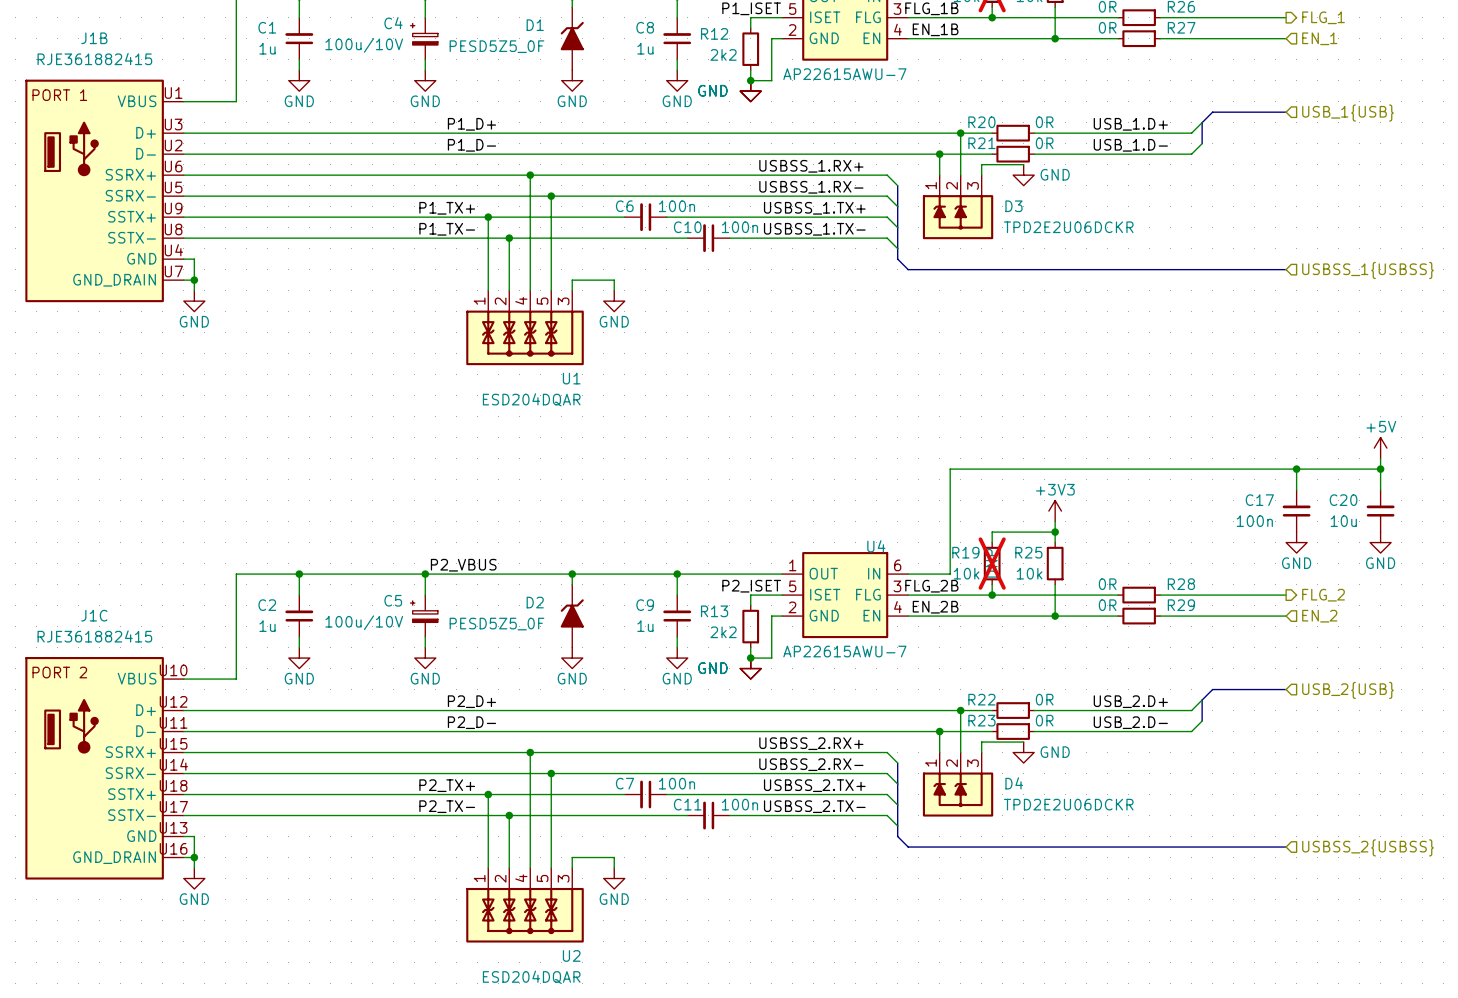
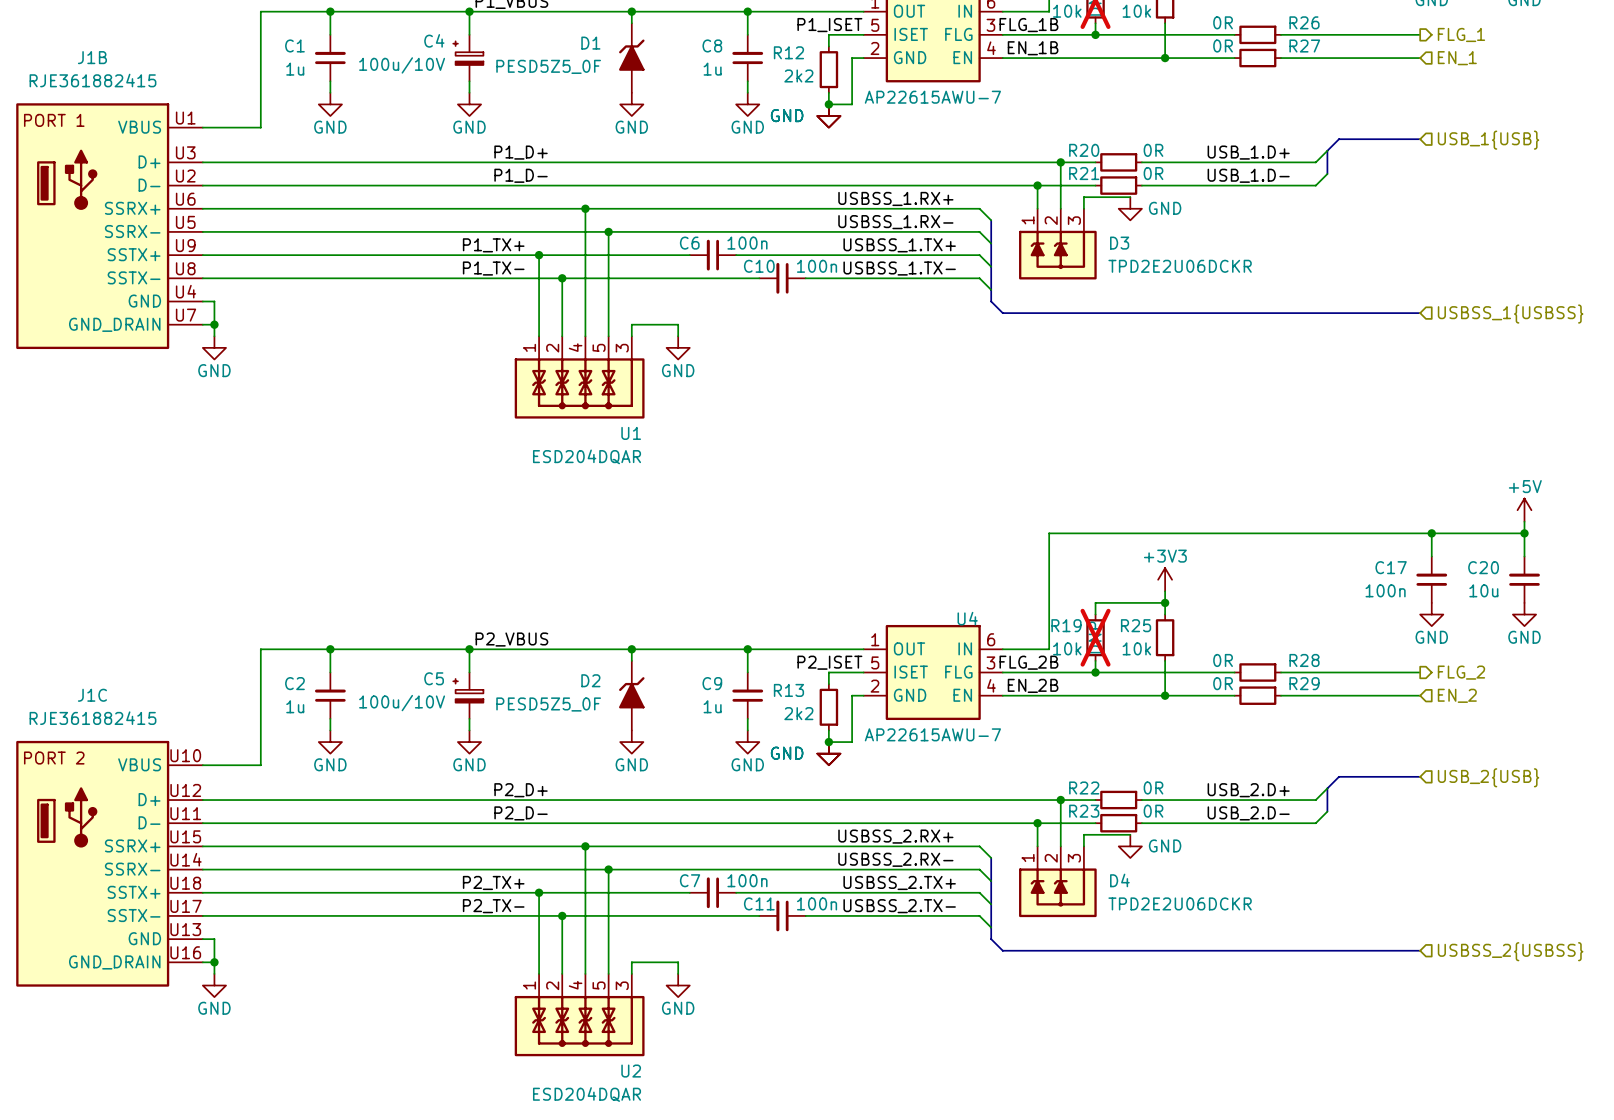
J1B symbol: [25, 79, 184, 303] -> [16, 103, 203, 350]
J1C symbol: [25, 657, 184, 880] -> [16, 740, 203, 987]

